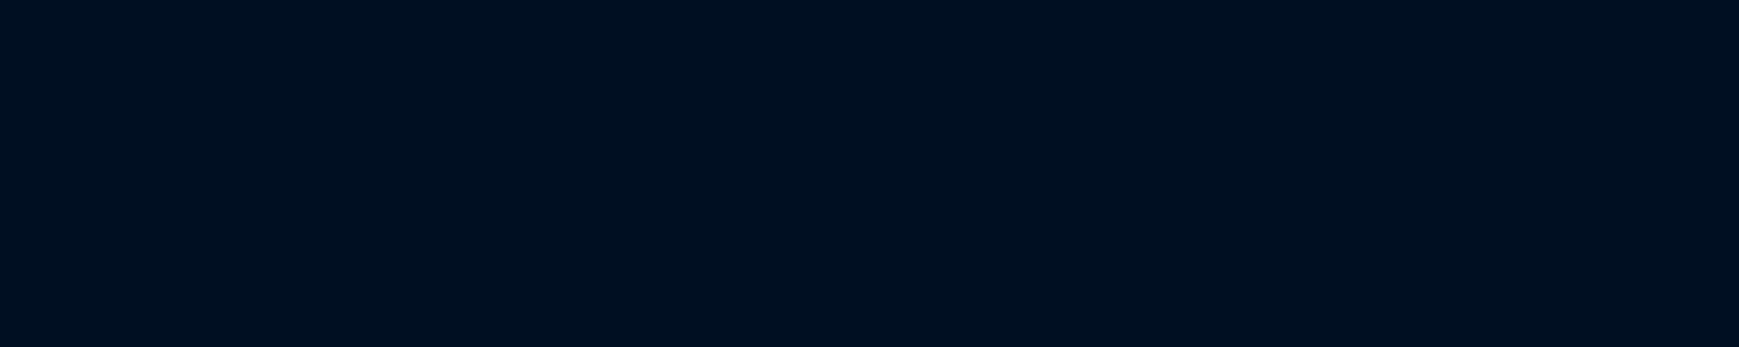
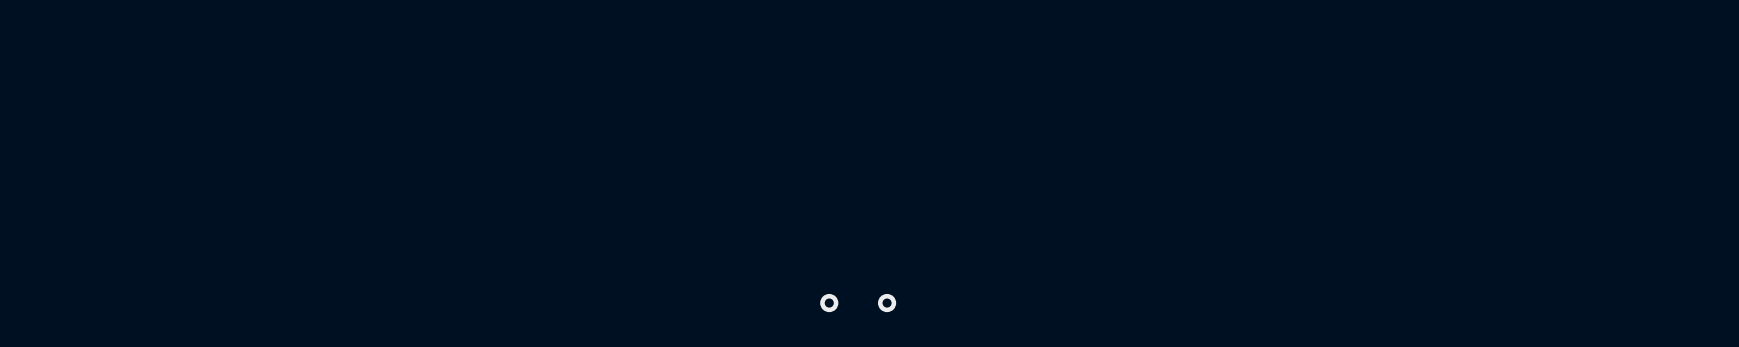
via: none -> (829, 303)
via: none -> (887, 303)

